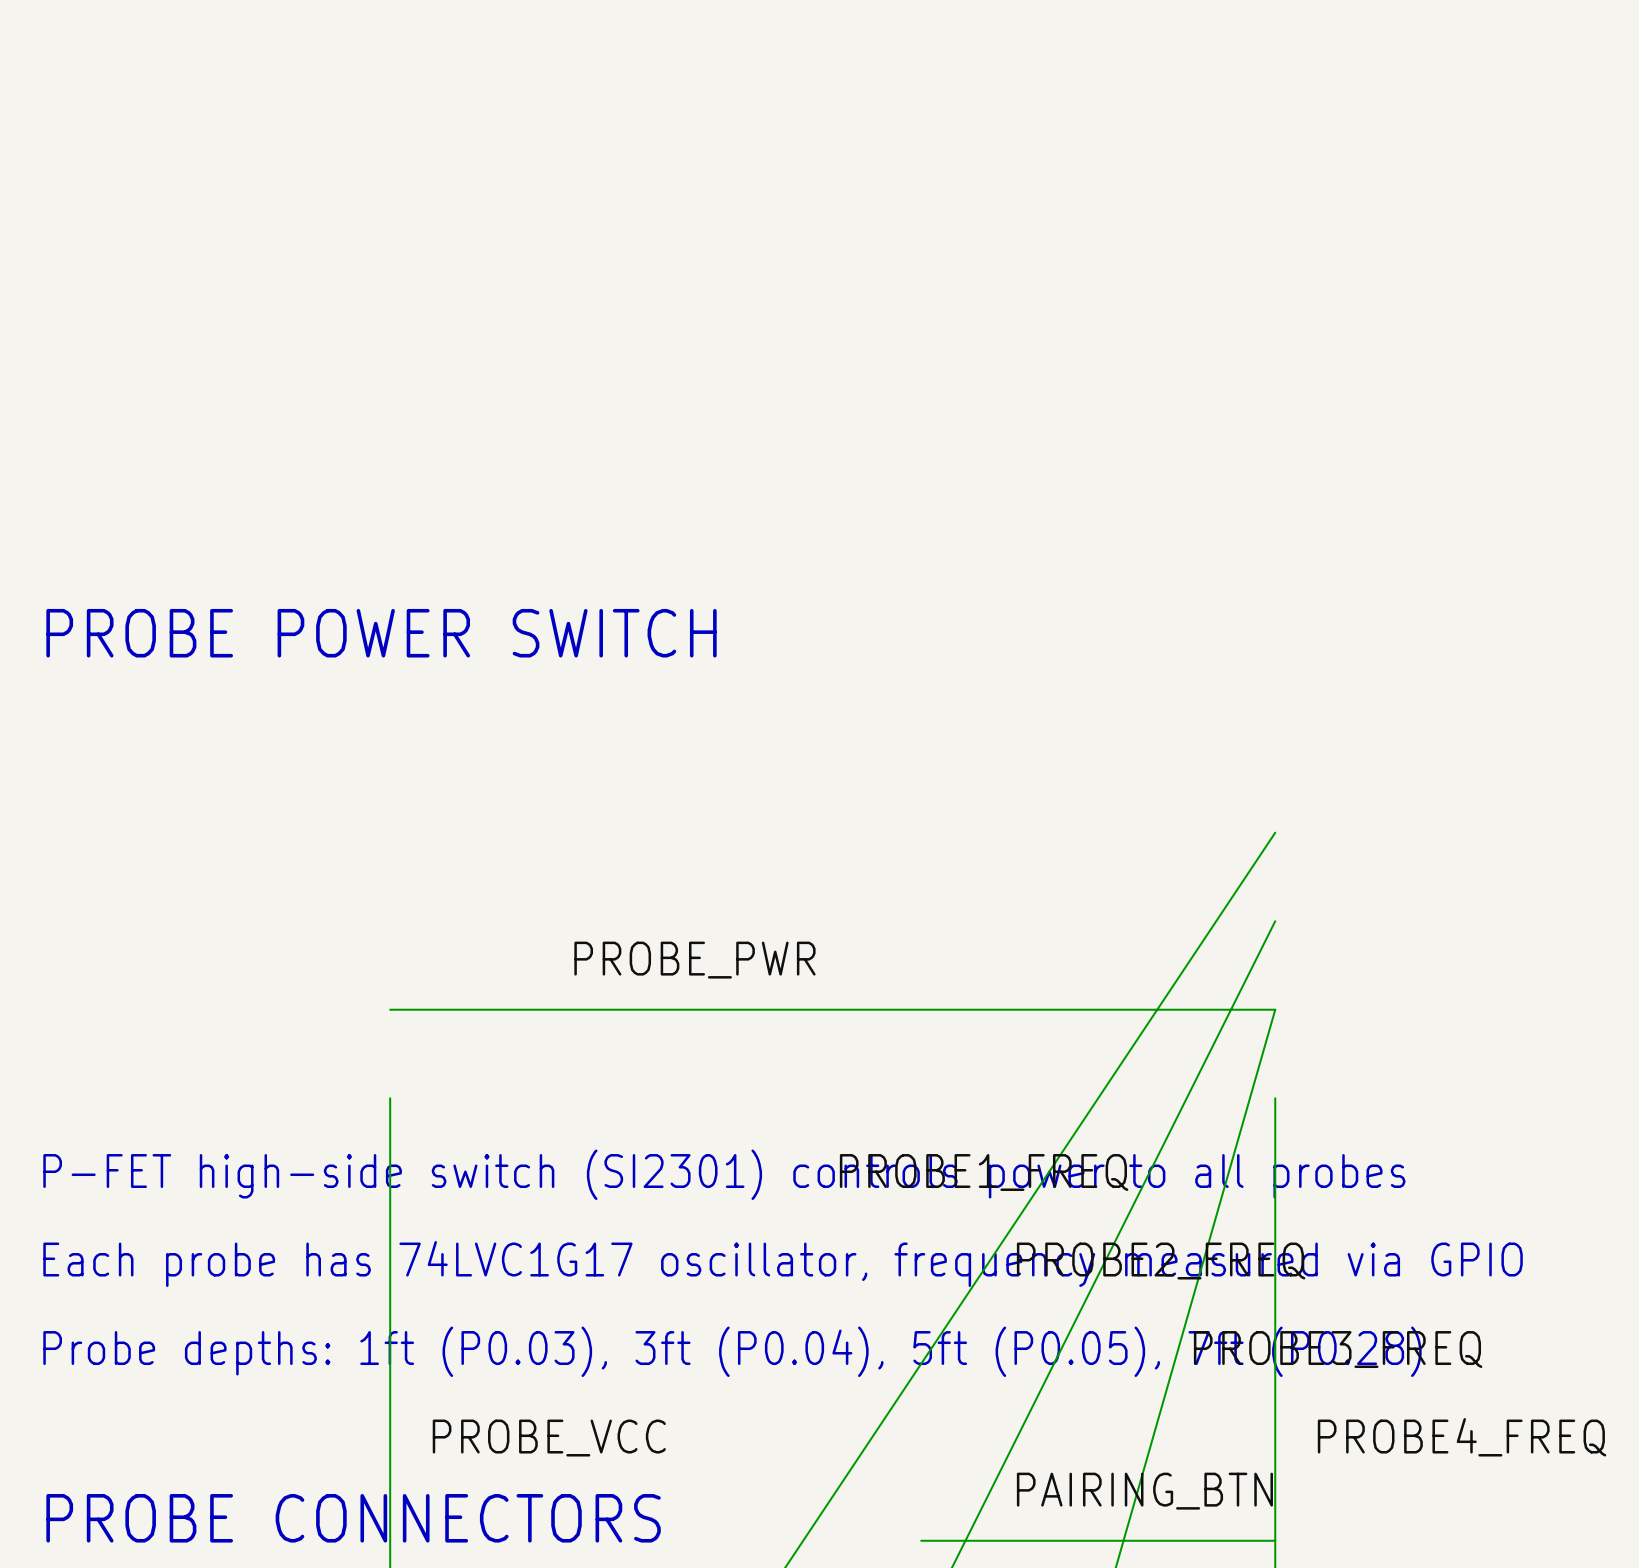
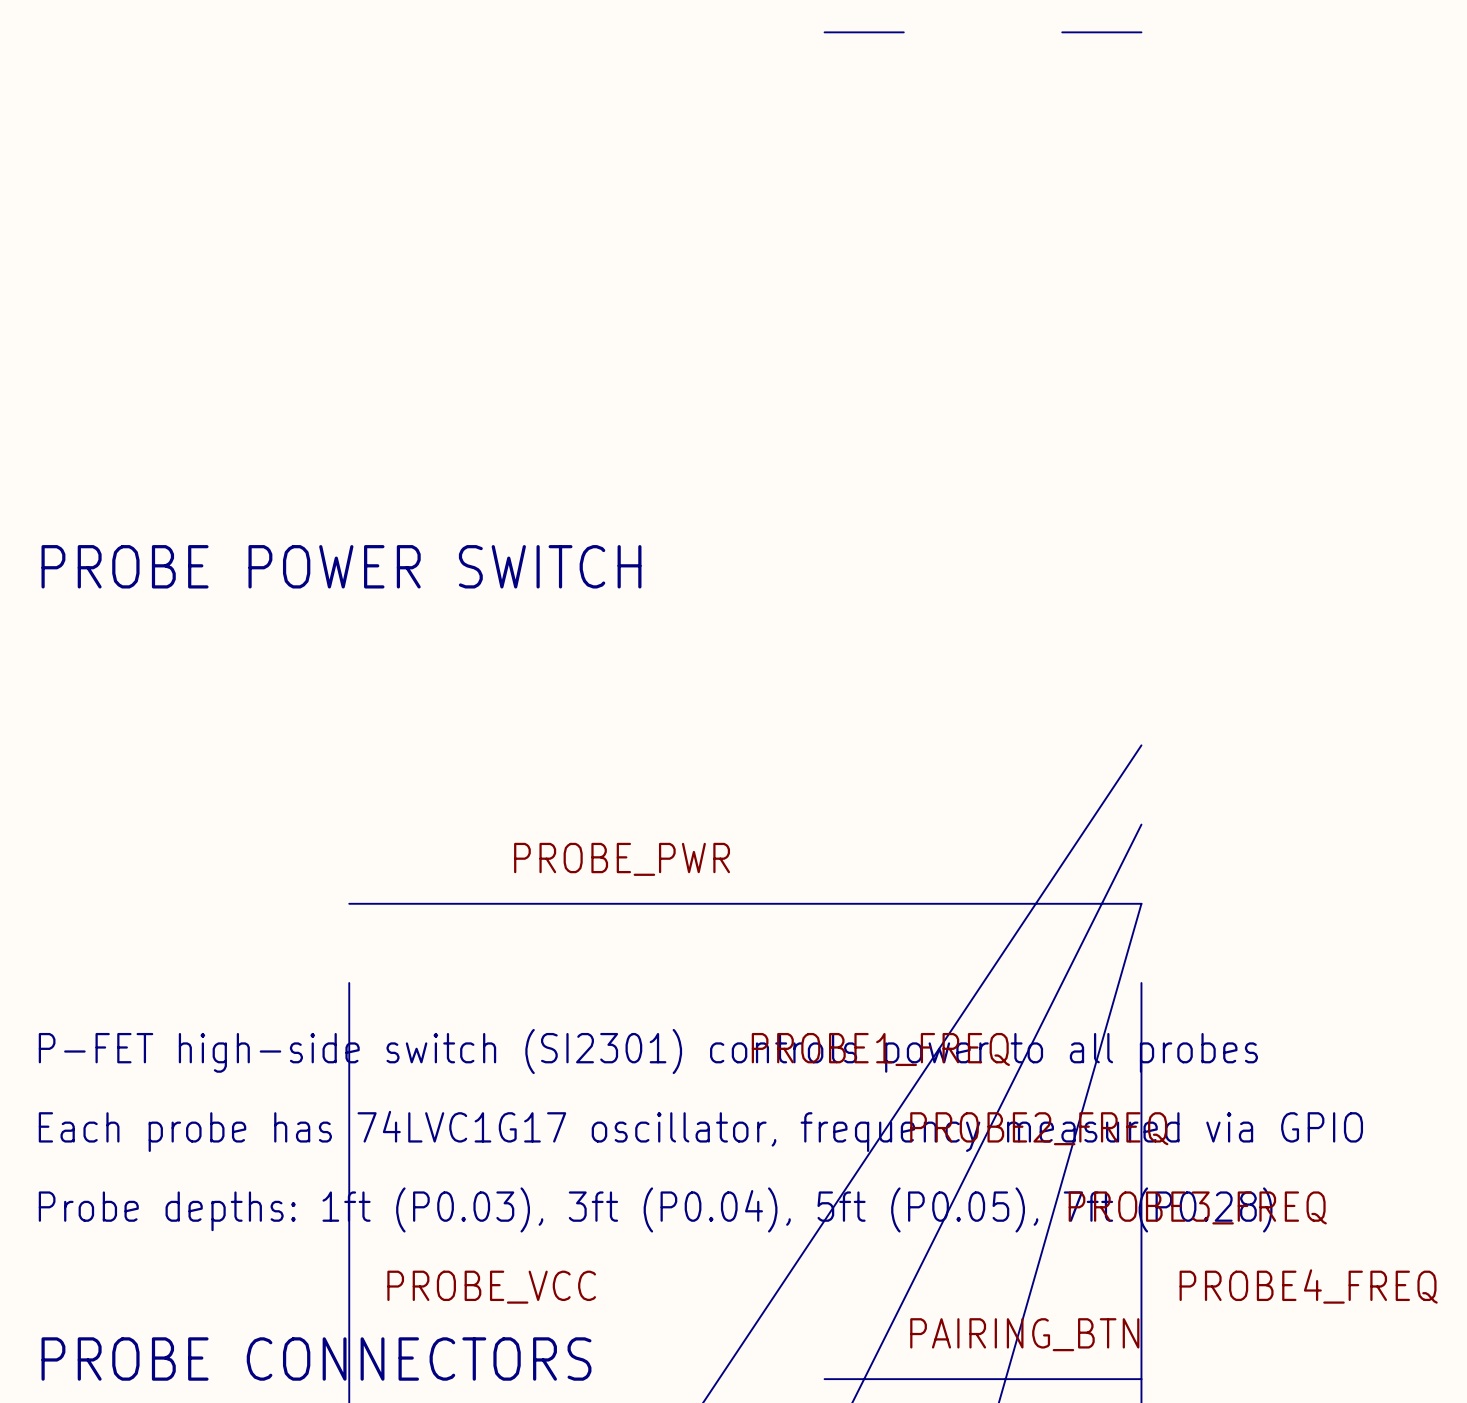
wire: none -> (824, 32) (903, 32)
wire: none -> (1062, 32) (1141, 32)

